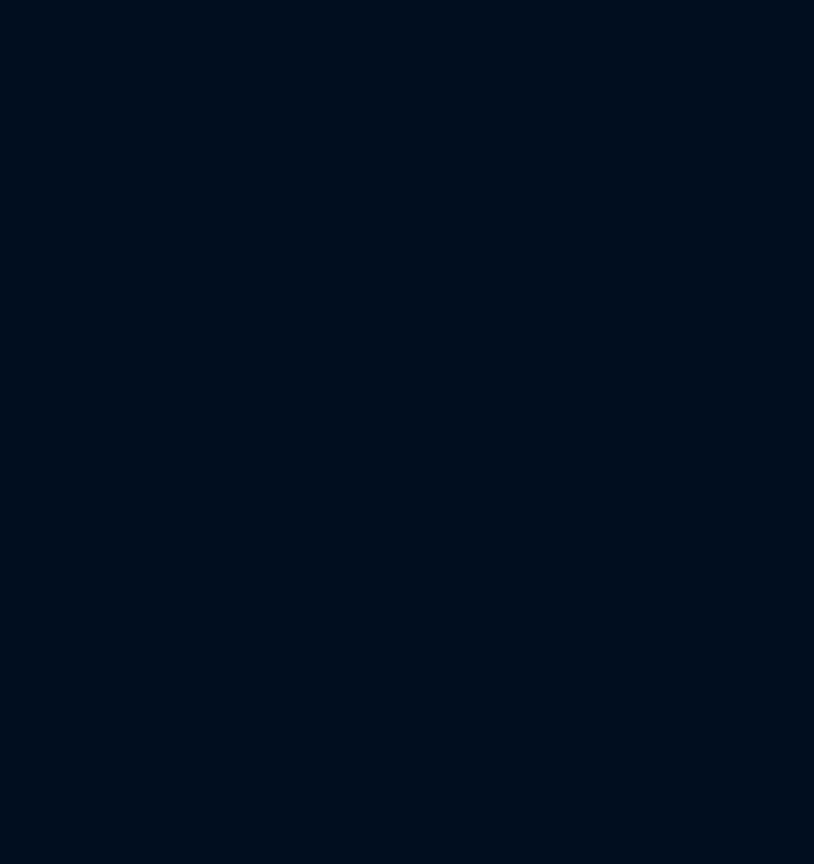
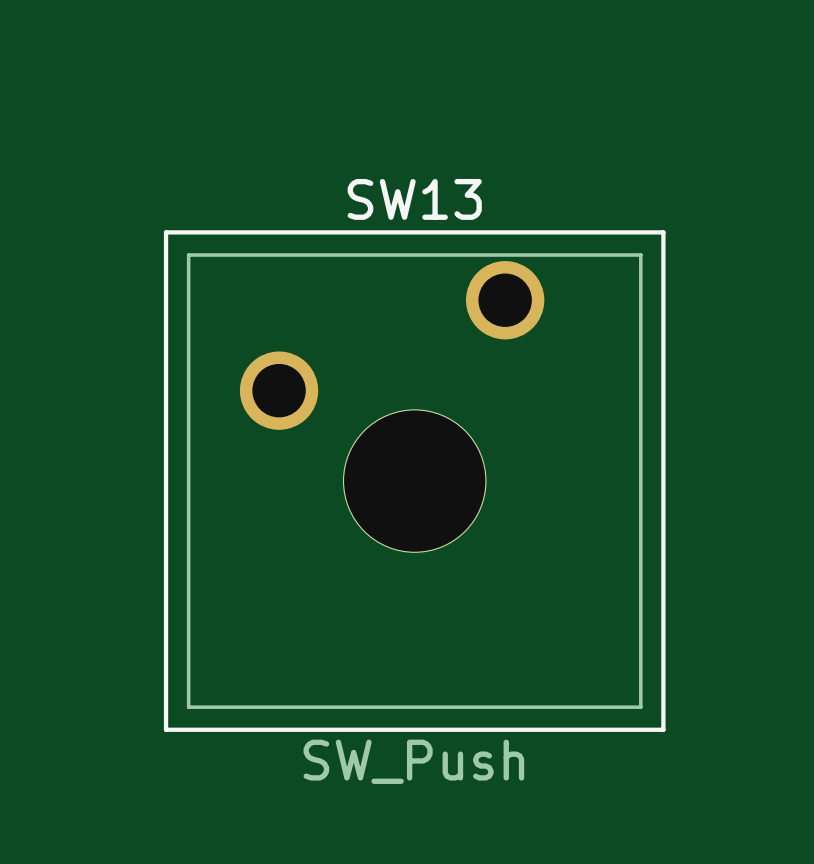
SW13: none -> SW_Push (414, 481)

